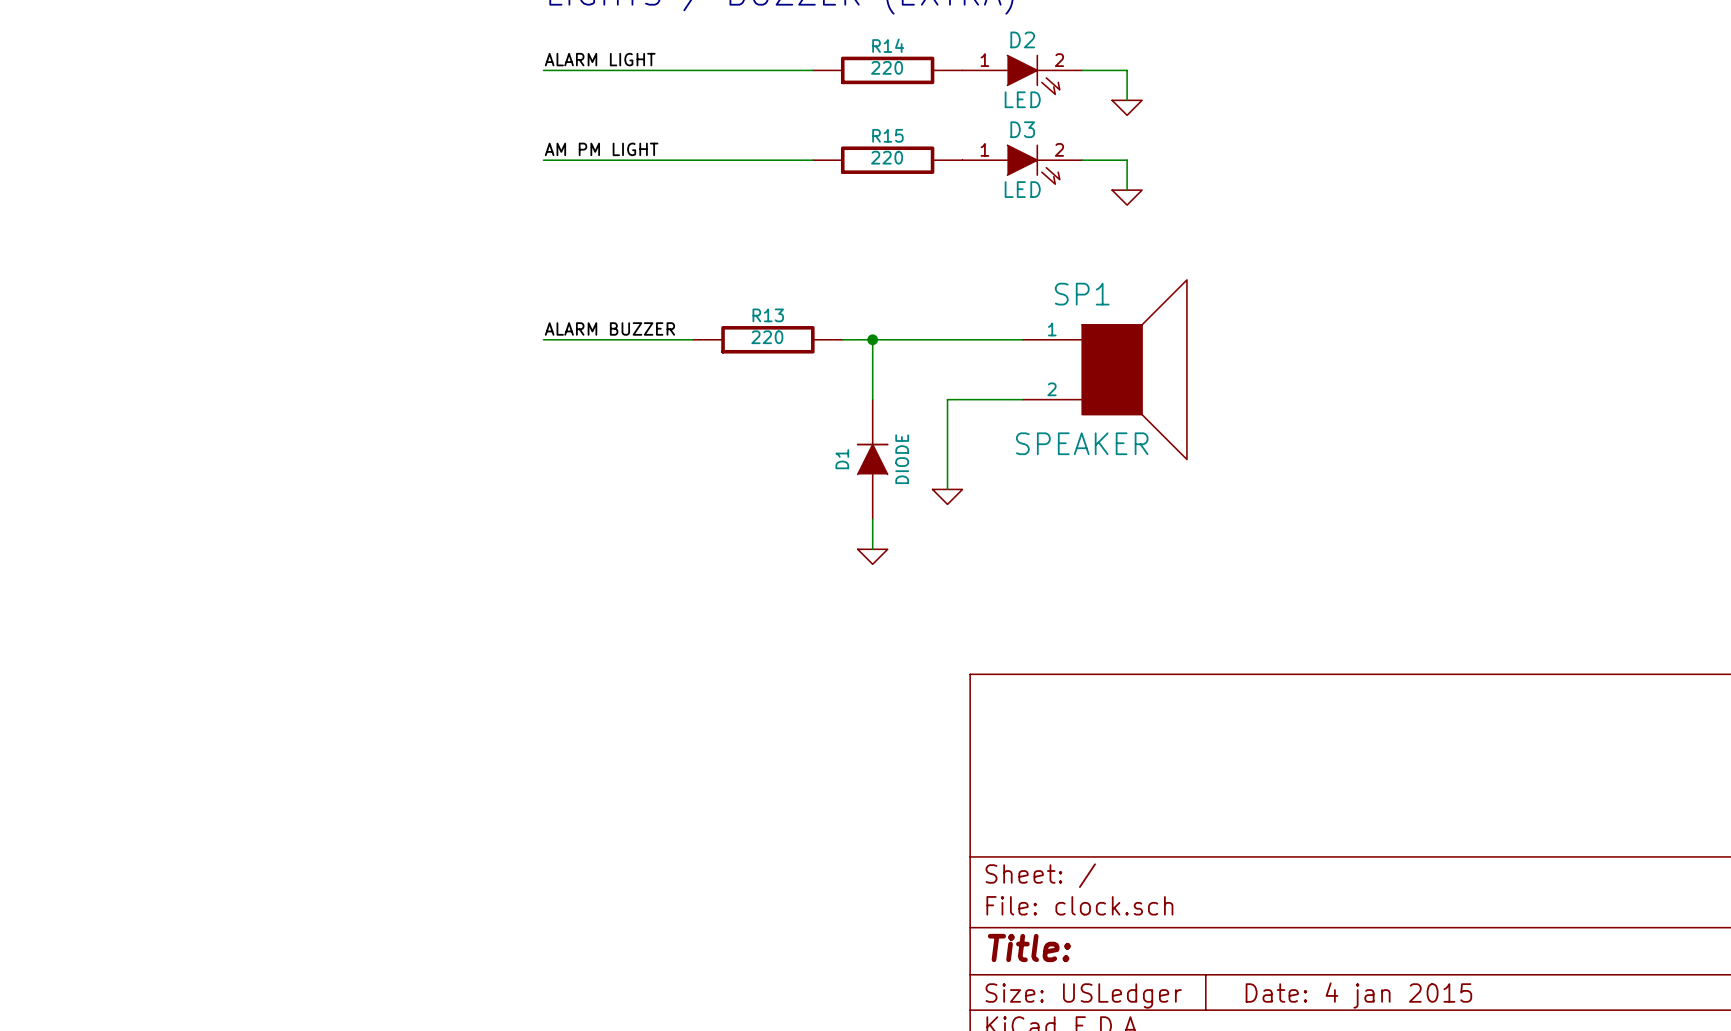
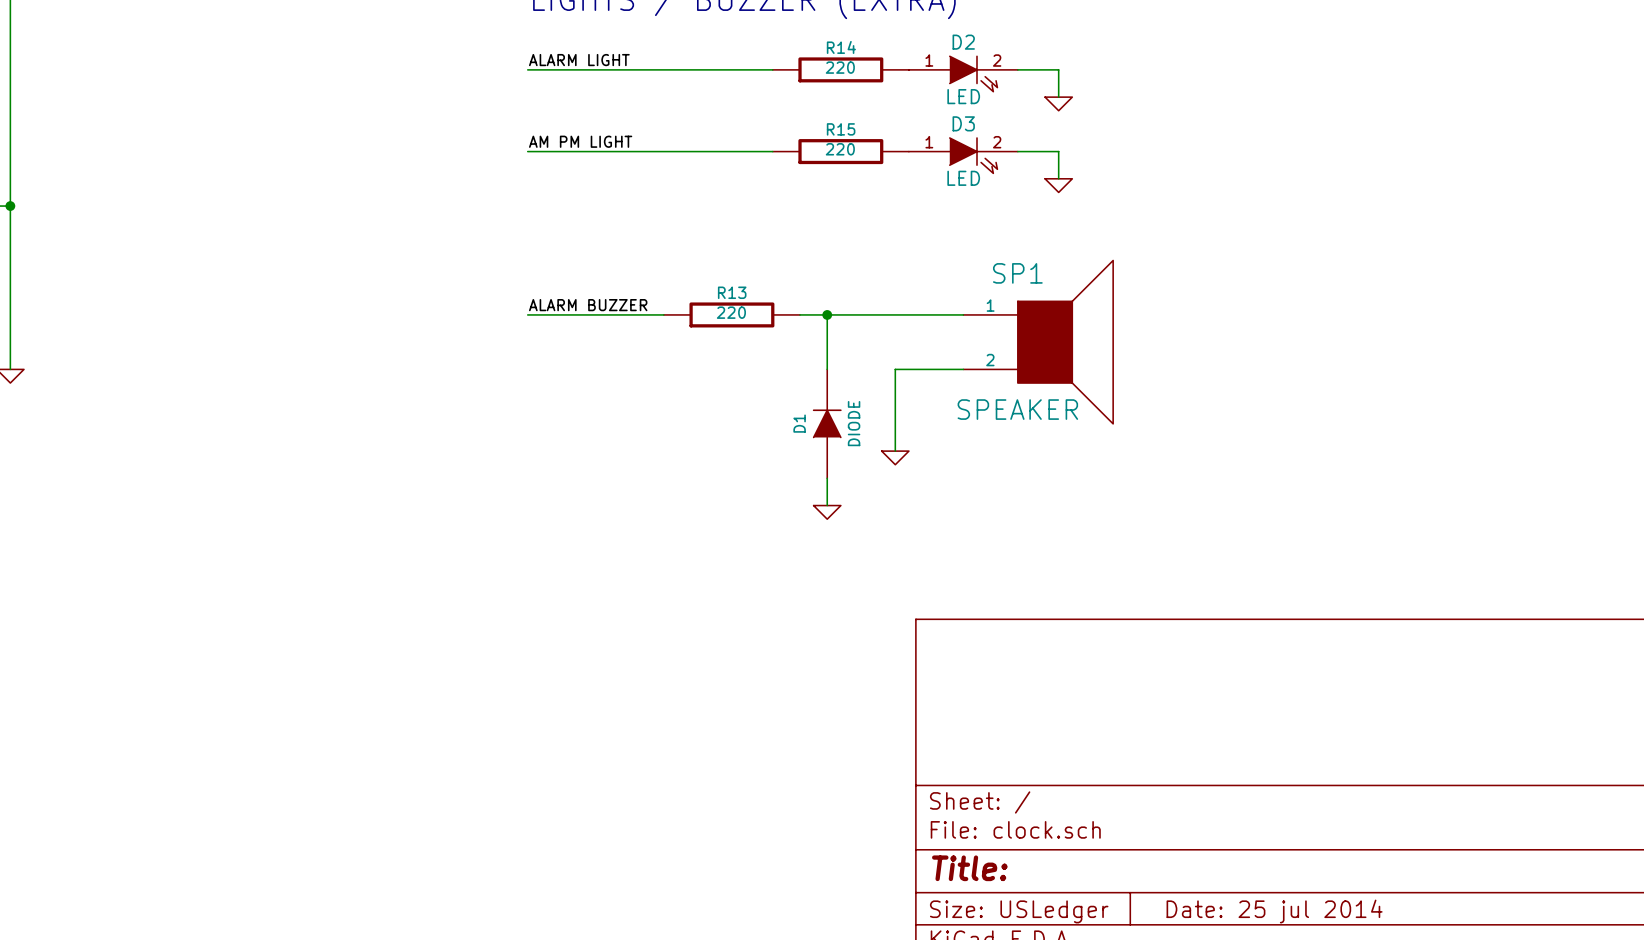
title block: Date: 4 jan 2015 (1358, 995) -> Date: 25 jul 2014 (1274, 911)

